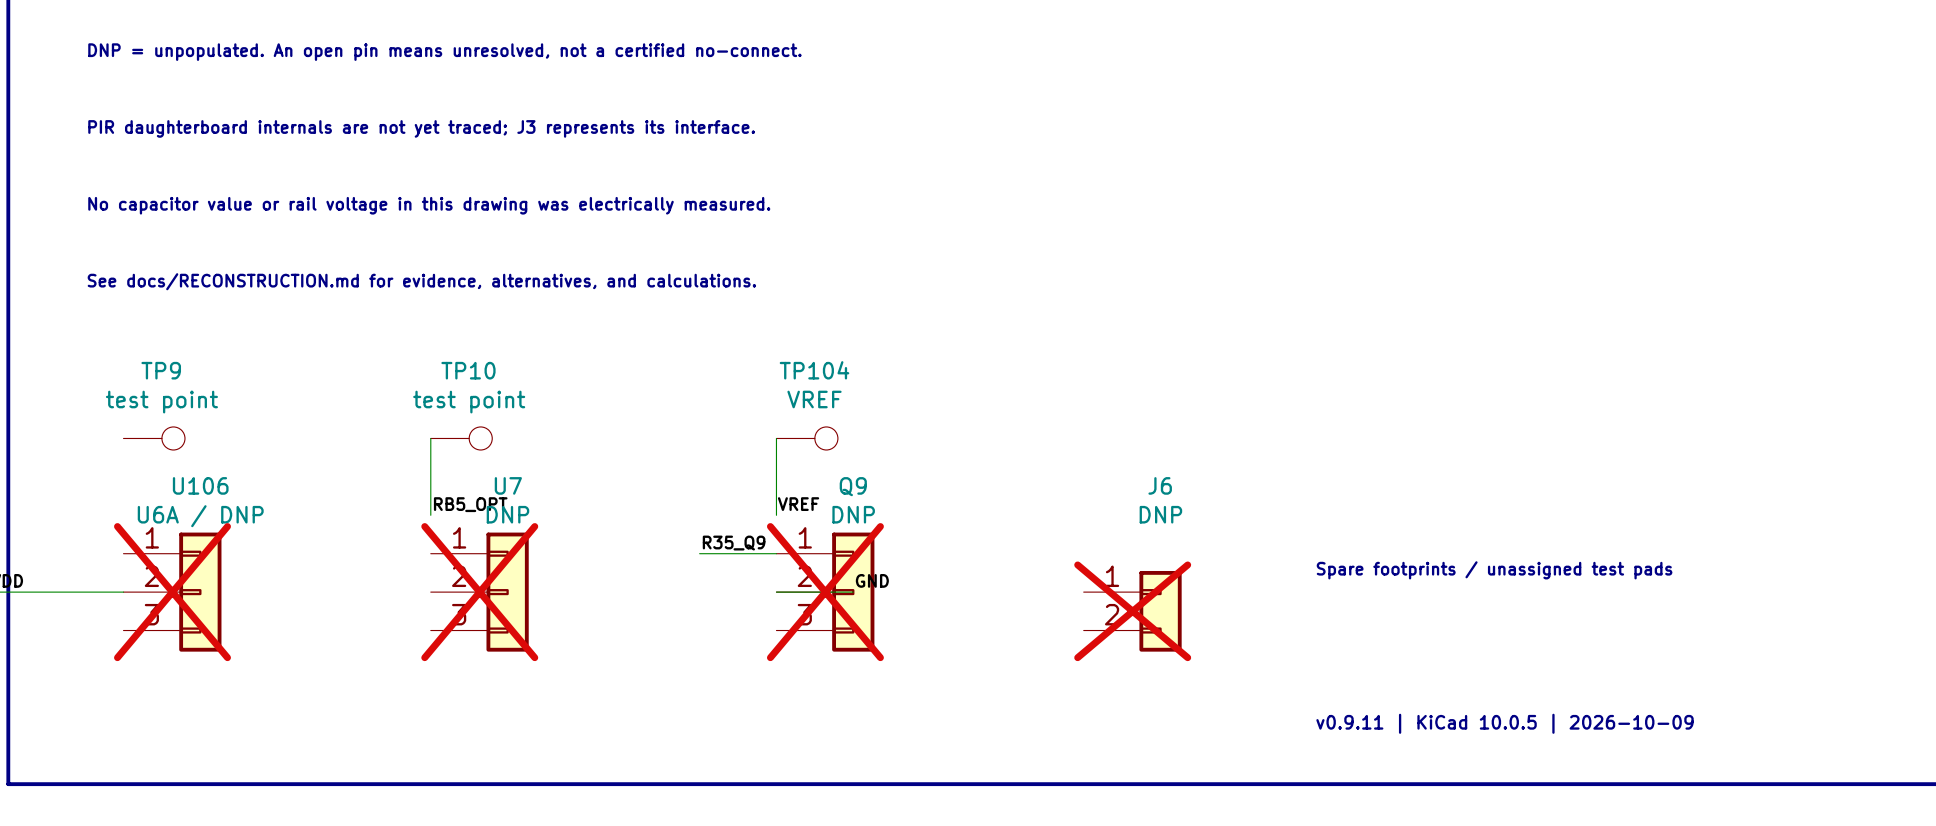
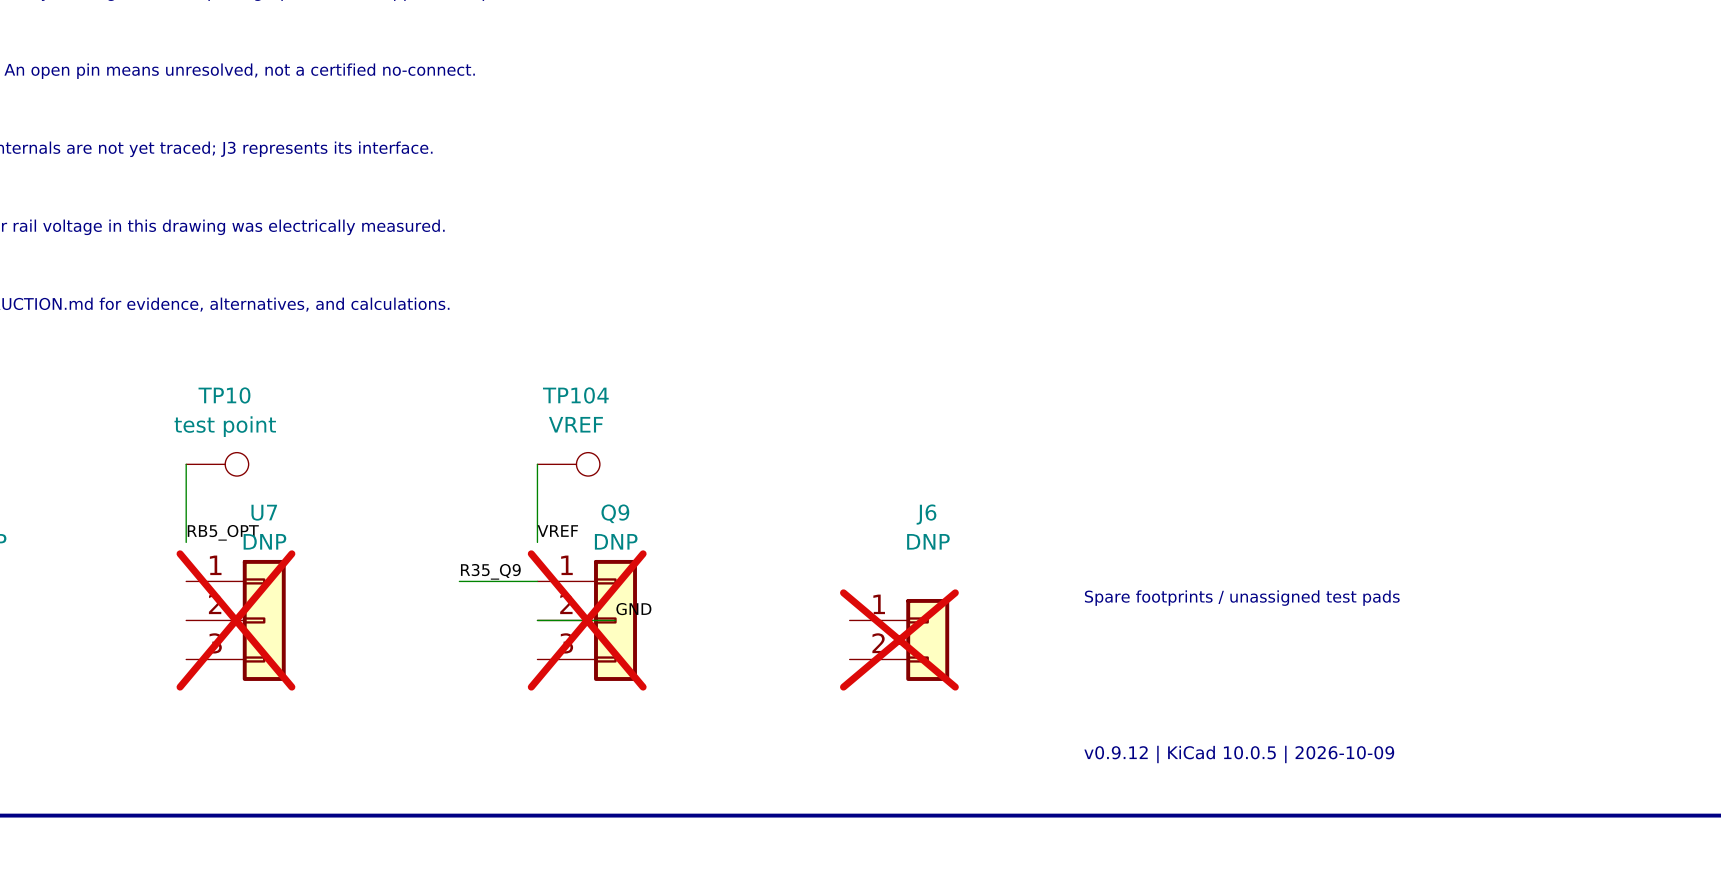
text: v0.9.11 | KiCad 10.0.5 | 2026-10-09 (1505, 723) -> v0.9.12 | KiCad 10.0.5 | 2026-10-09 (1239, 754)

